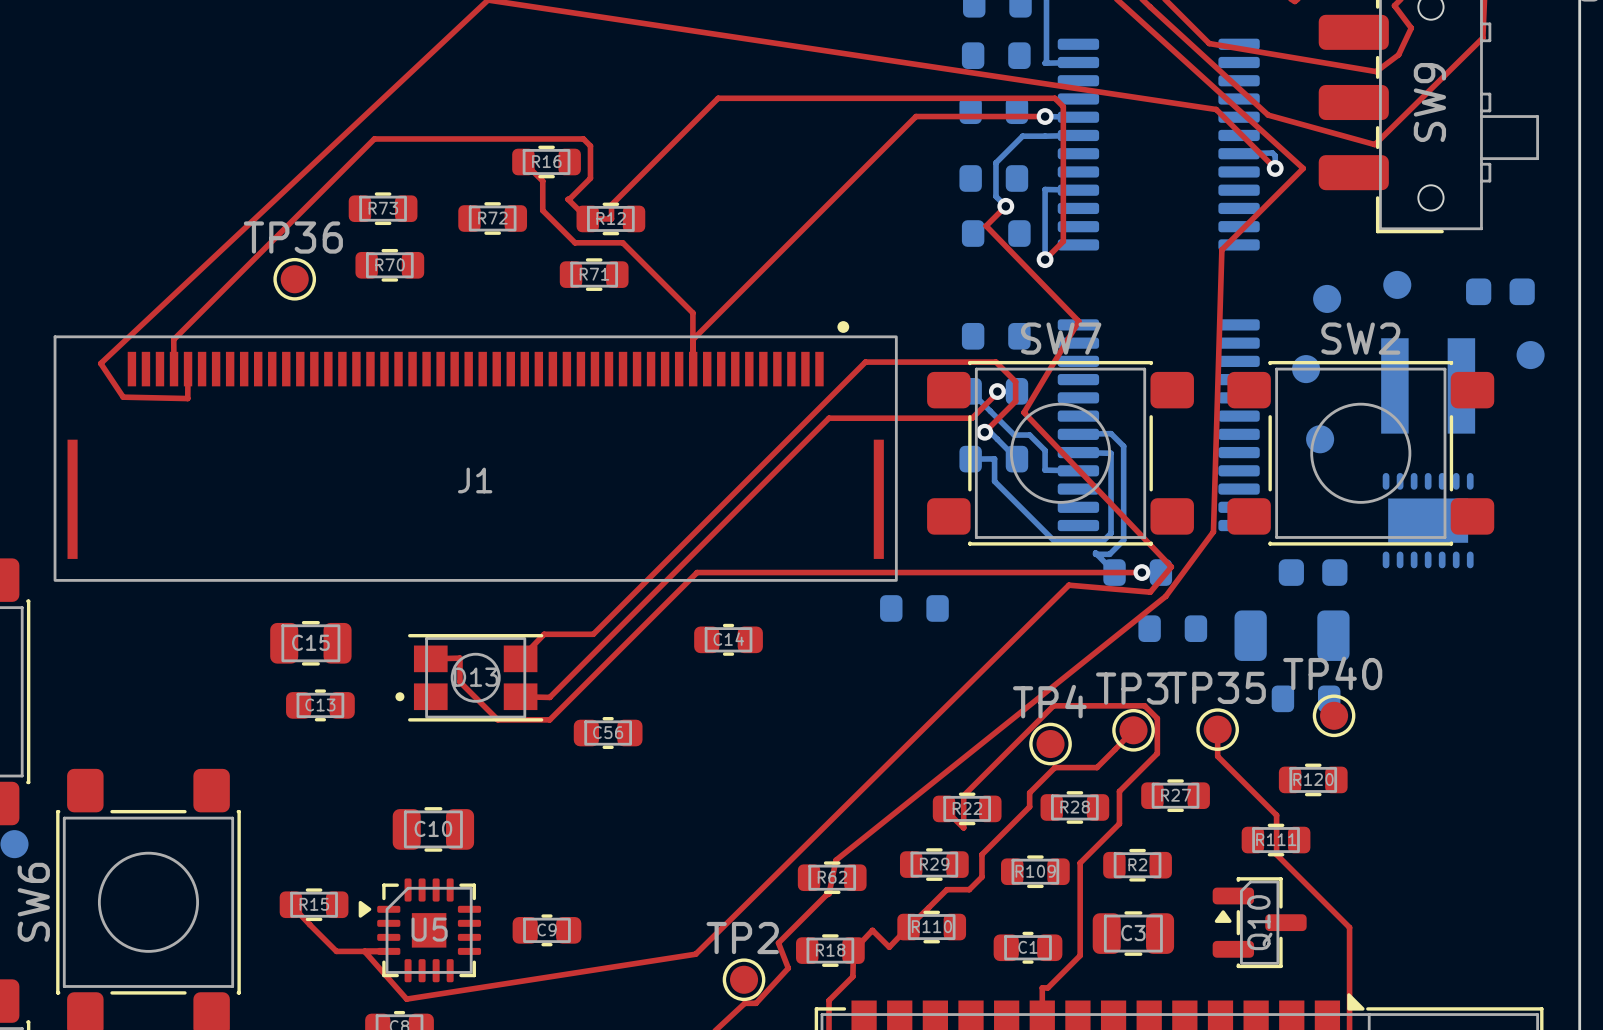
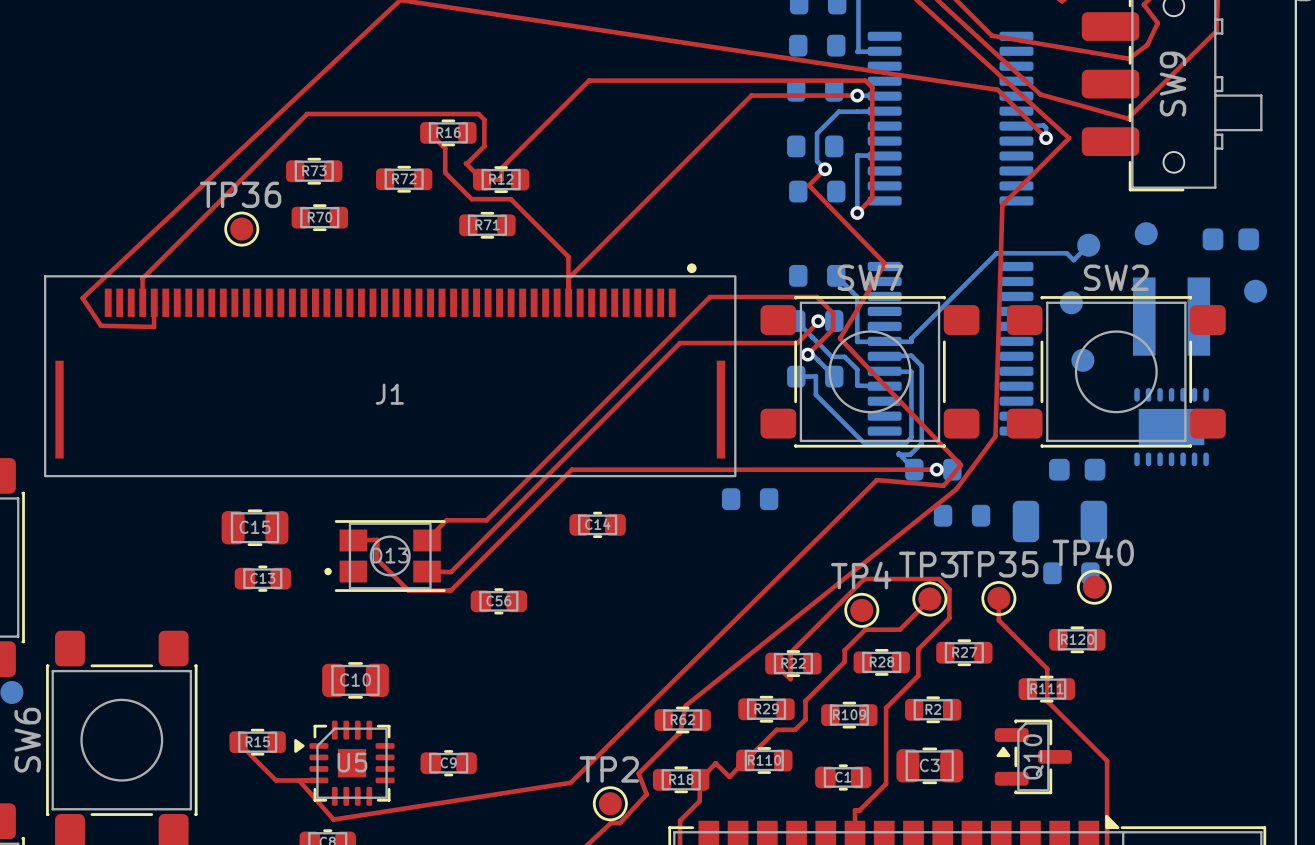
bottom track: none -> (1088, 245) (1073, 260) (1066, 253) (996, 253) (911, 338) (911, 341) (857, 341) (857, 297) (836, 275)

